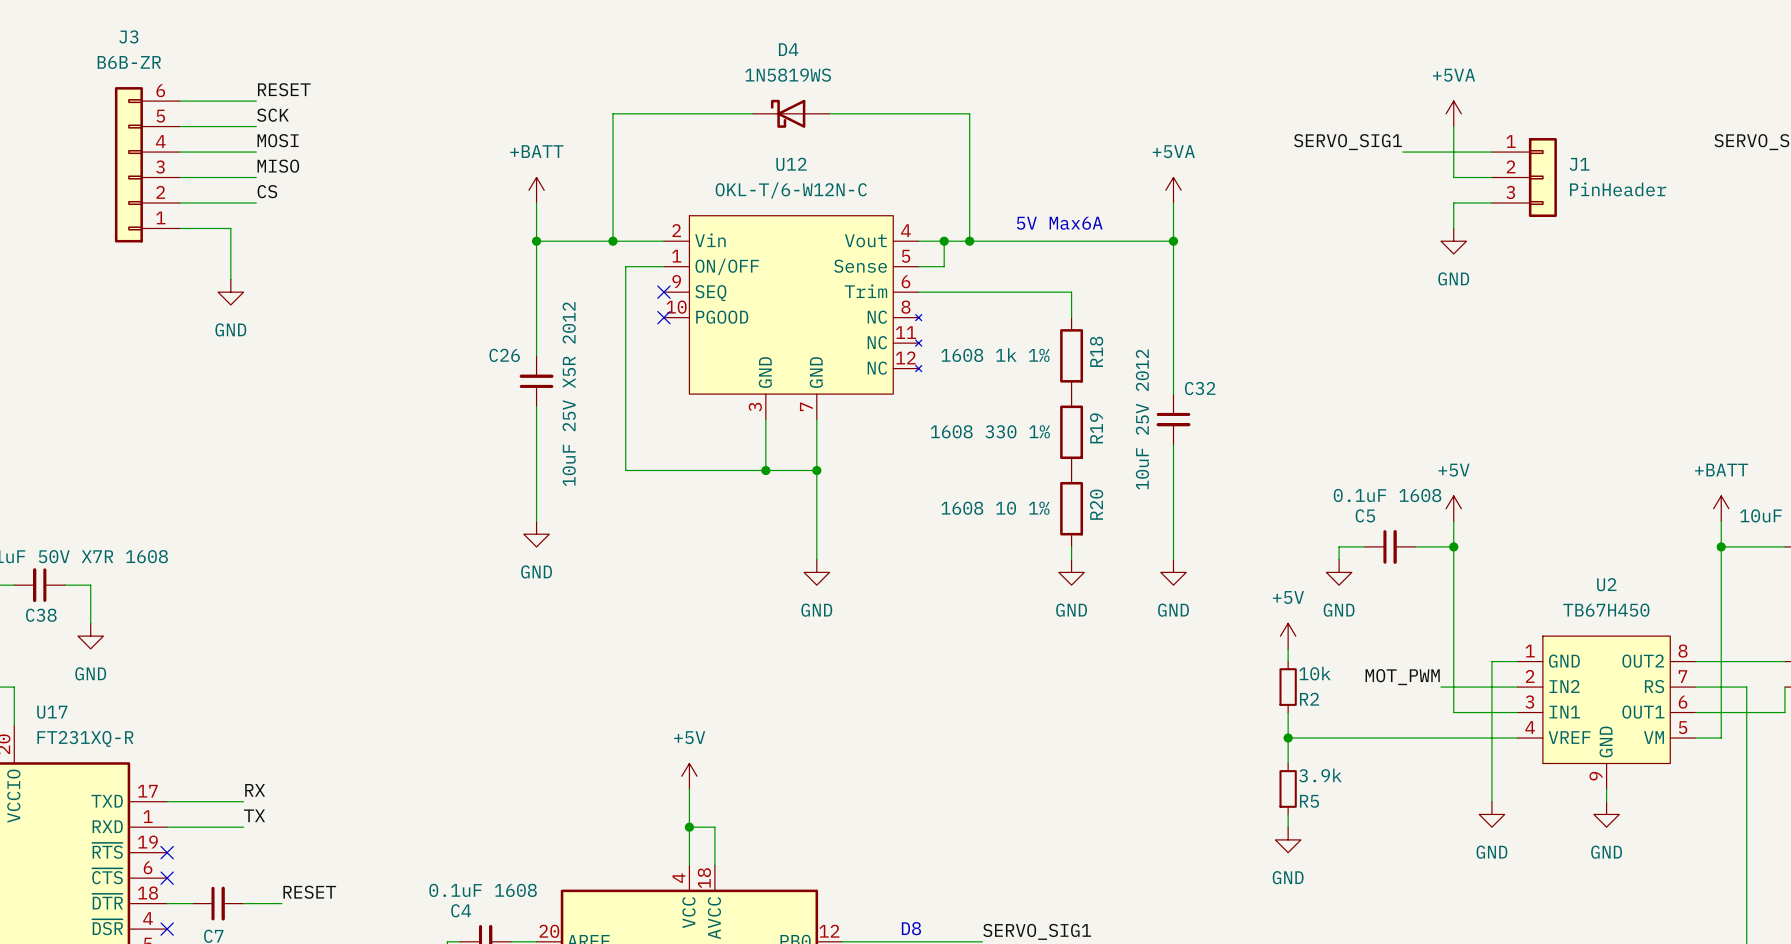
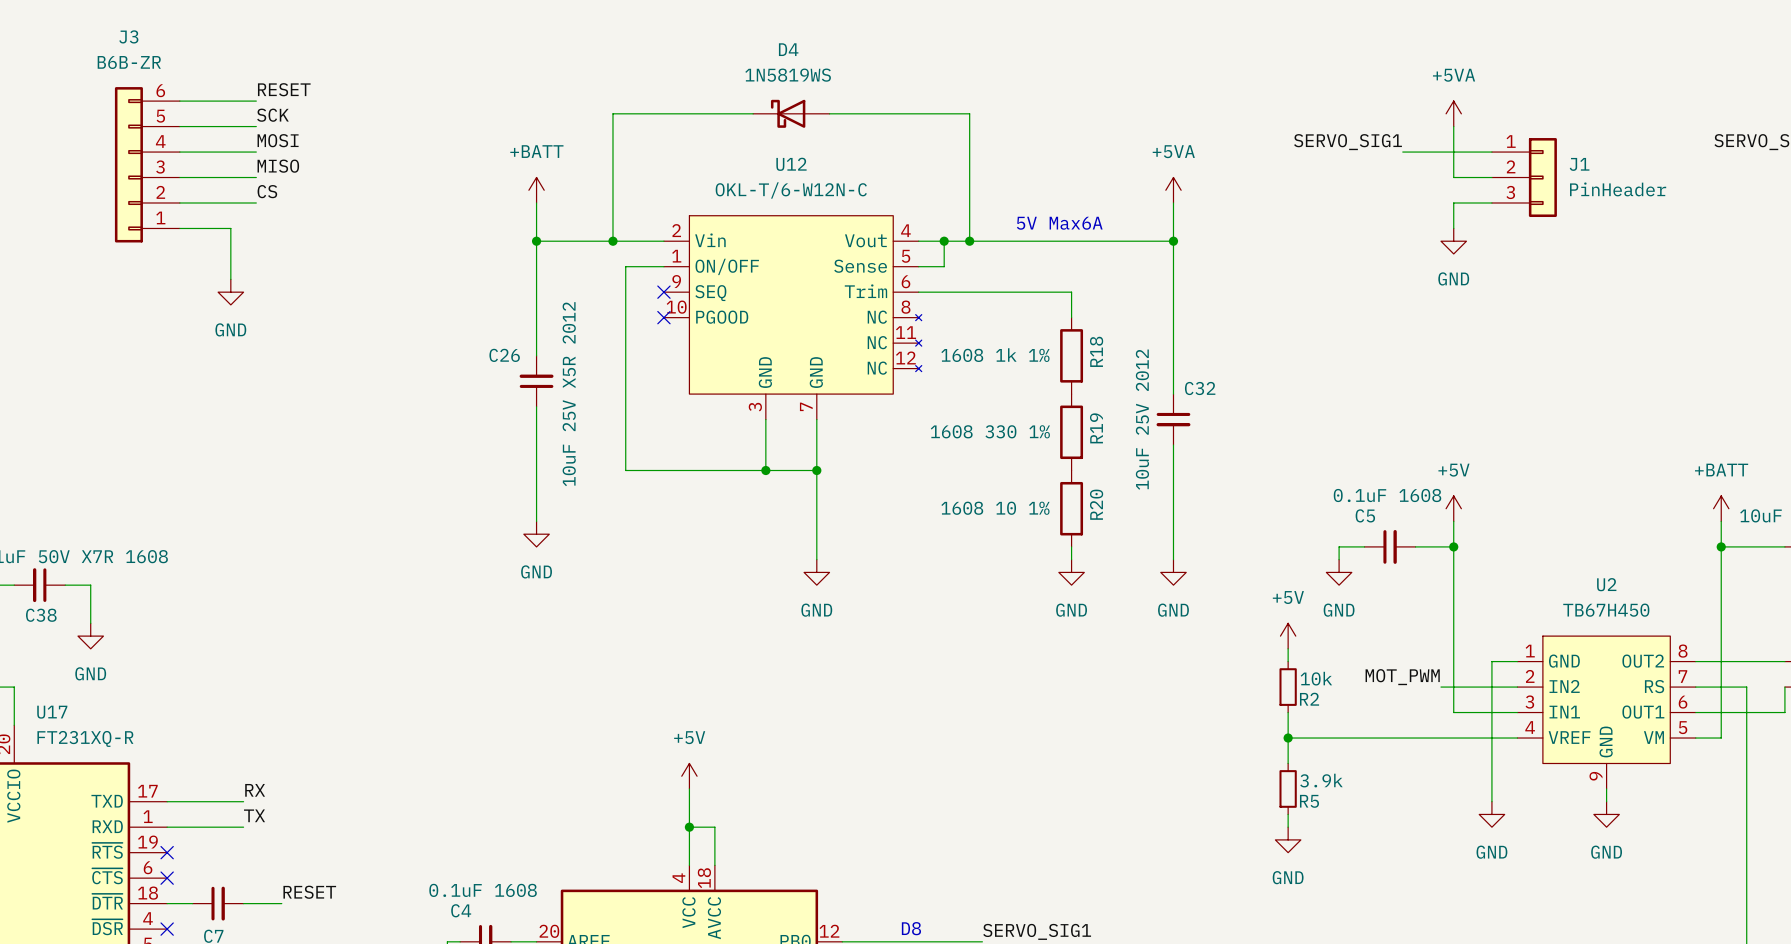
R2 value: 10k (1314, 673) -> none
R2 text: none -> 10k (1316, 678)
R5 value: 3.9k (1320, 775) -> none
R5 text: none -> 3.9k (1321, 780)

